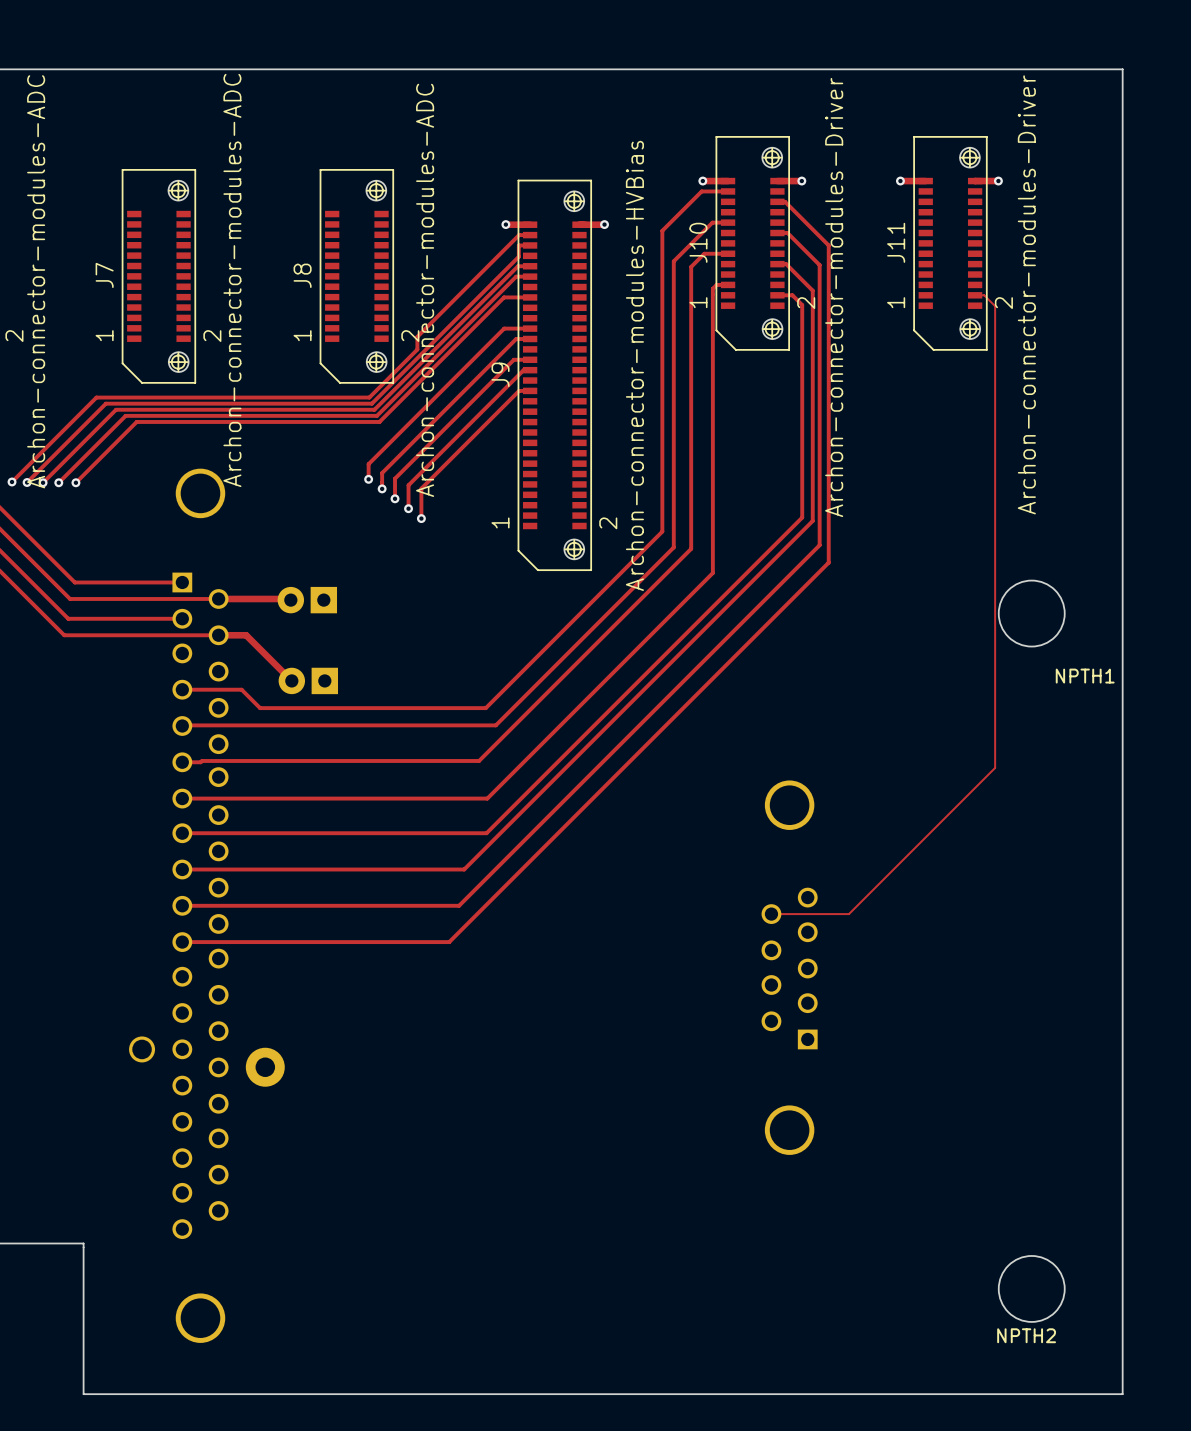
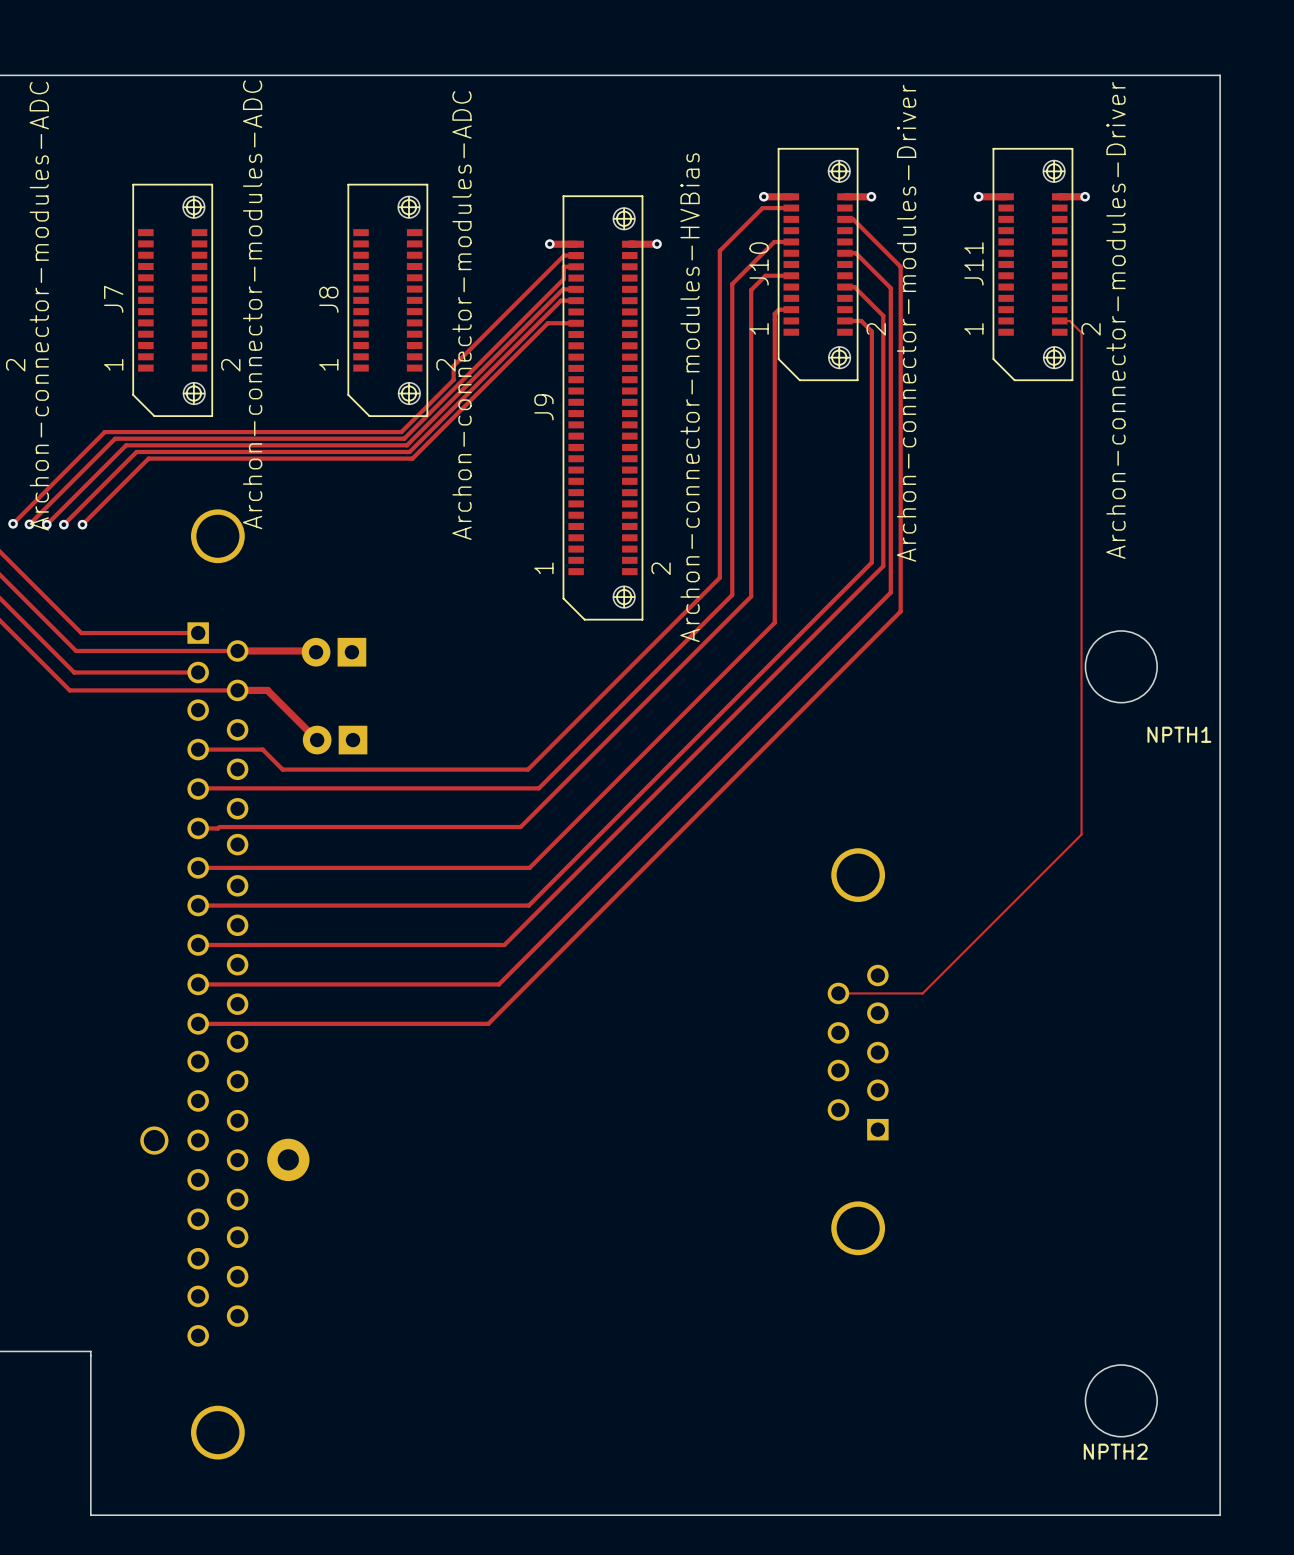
track: (530, 328) (504, 328) (368, 464) (368, 479) -> none
track: (530, 338) (516, 338) (382, 473) (382, 488) -> none
track: (530, 359) (513, 359) (395, 478) (395, 498) -> none
track: (530, 370) (523, 370) (408, 485) (408, 508) -> none
track: (530, 390) (519, 390) (421, 488) (421, 518) -> none
via: (368, 479) -> none
via: (382, 488) -> none
via: (395, 498) -> none
via: (408, 508) -> none
via: (421, 518) -> none

